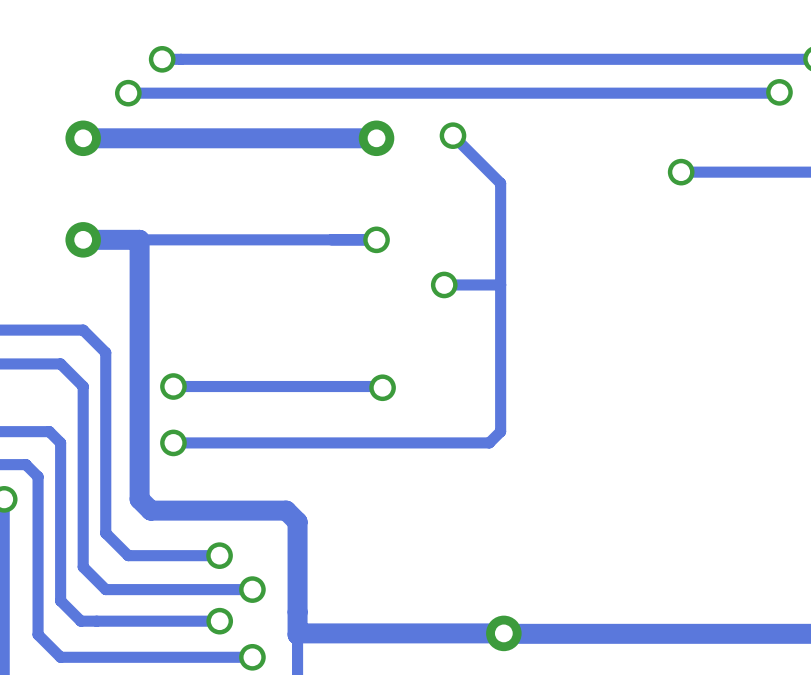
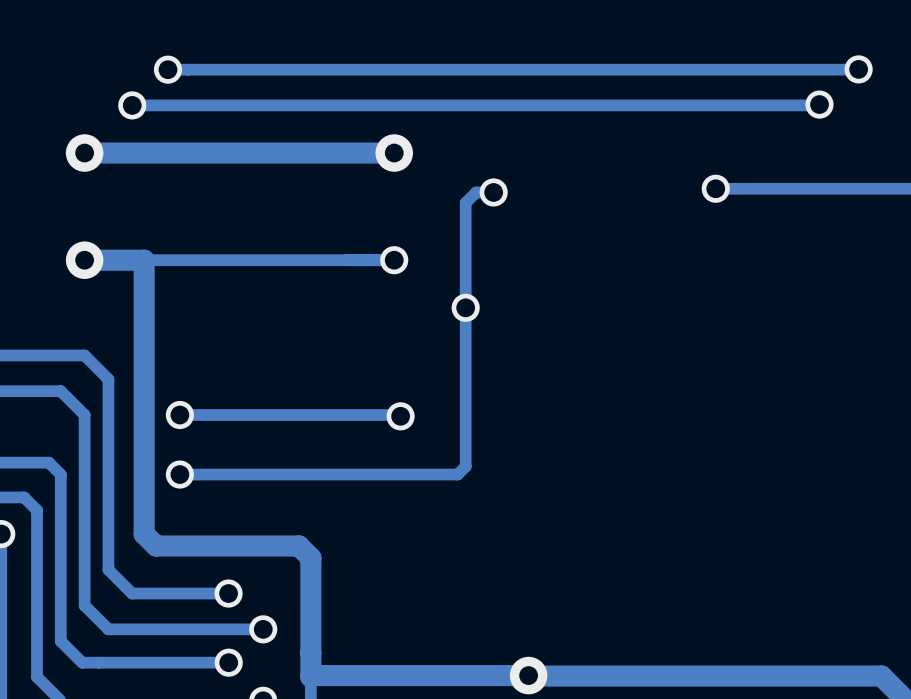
track: (452, 135) (500, 183) (500, 431) (489, 442) (436, 442) -> (493, 192) (476, 192) (465, 202) (465, 466) (457, 474)
via position: (452, 135) -> (493, 192)
track: (500, 284) (444, 284) -> none

